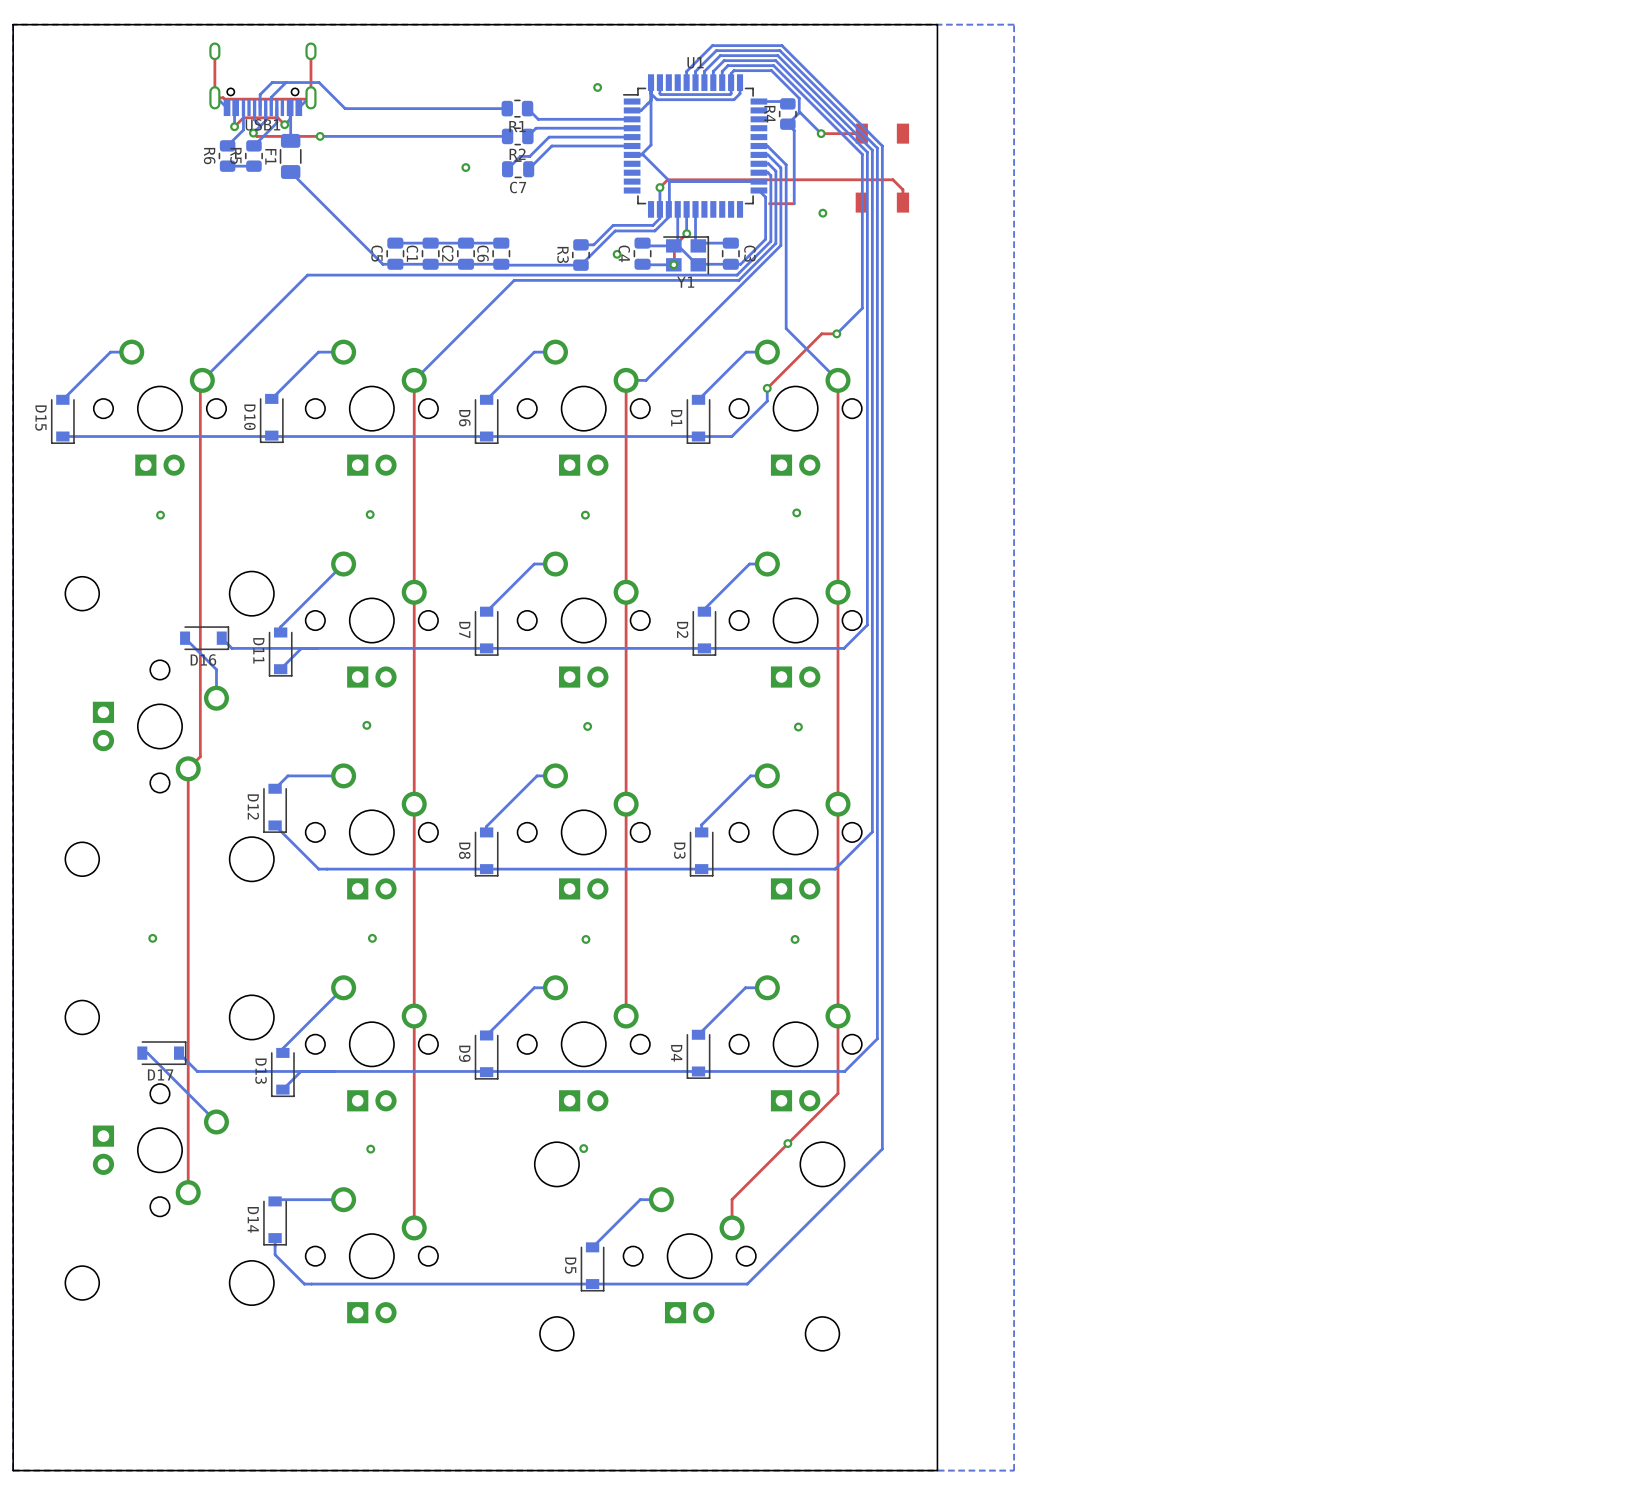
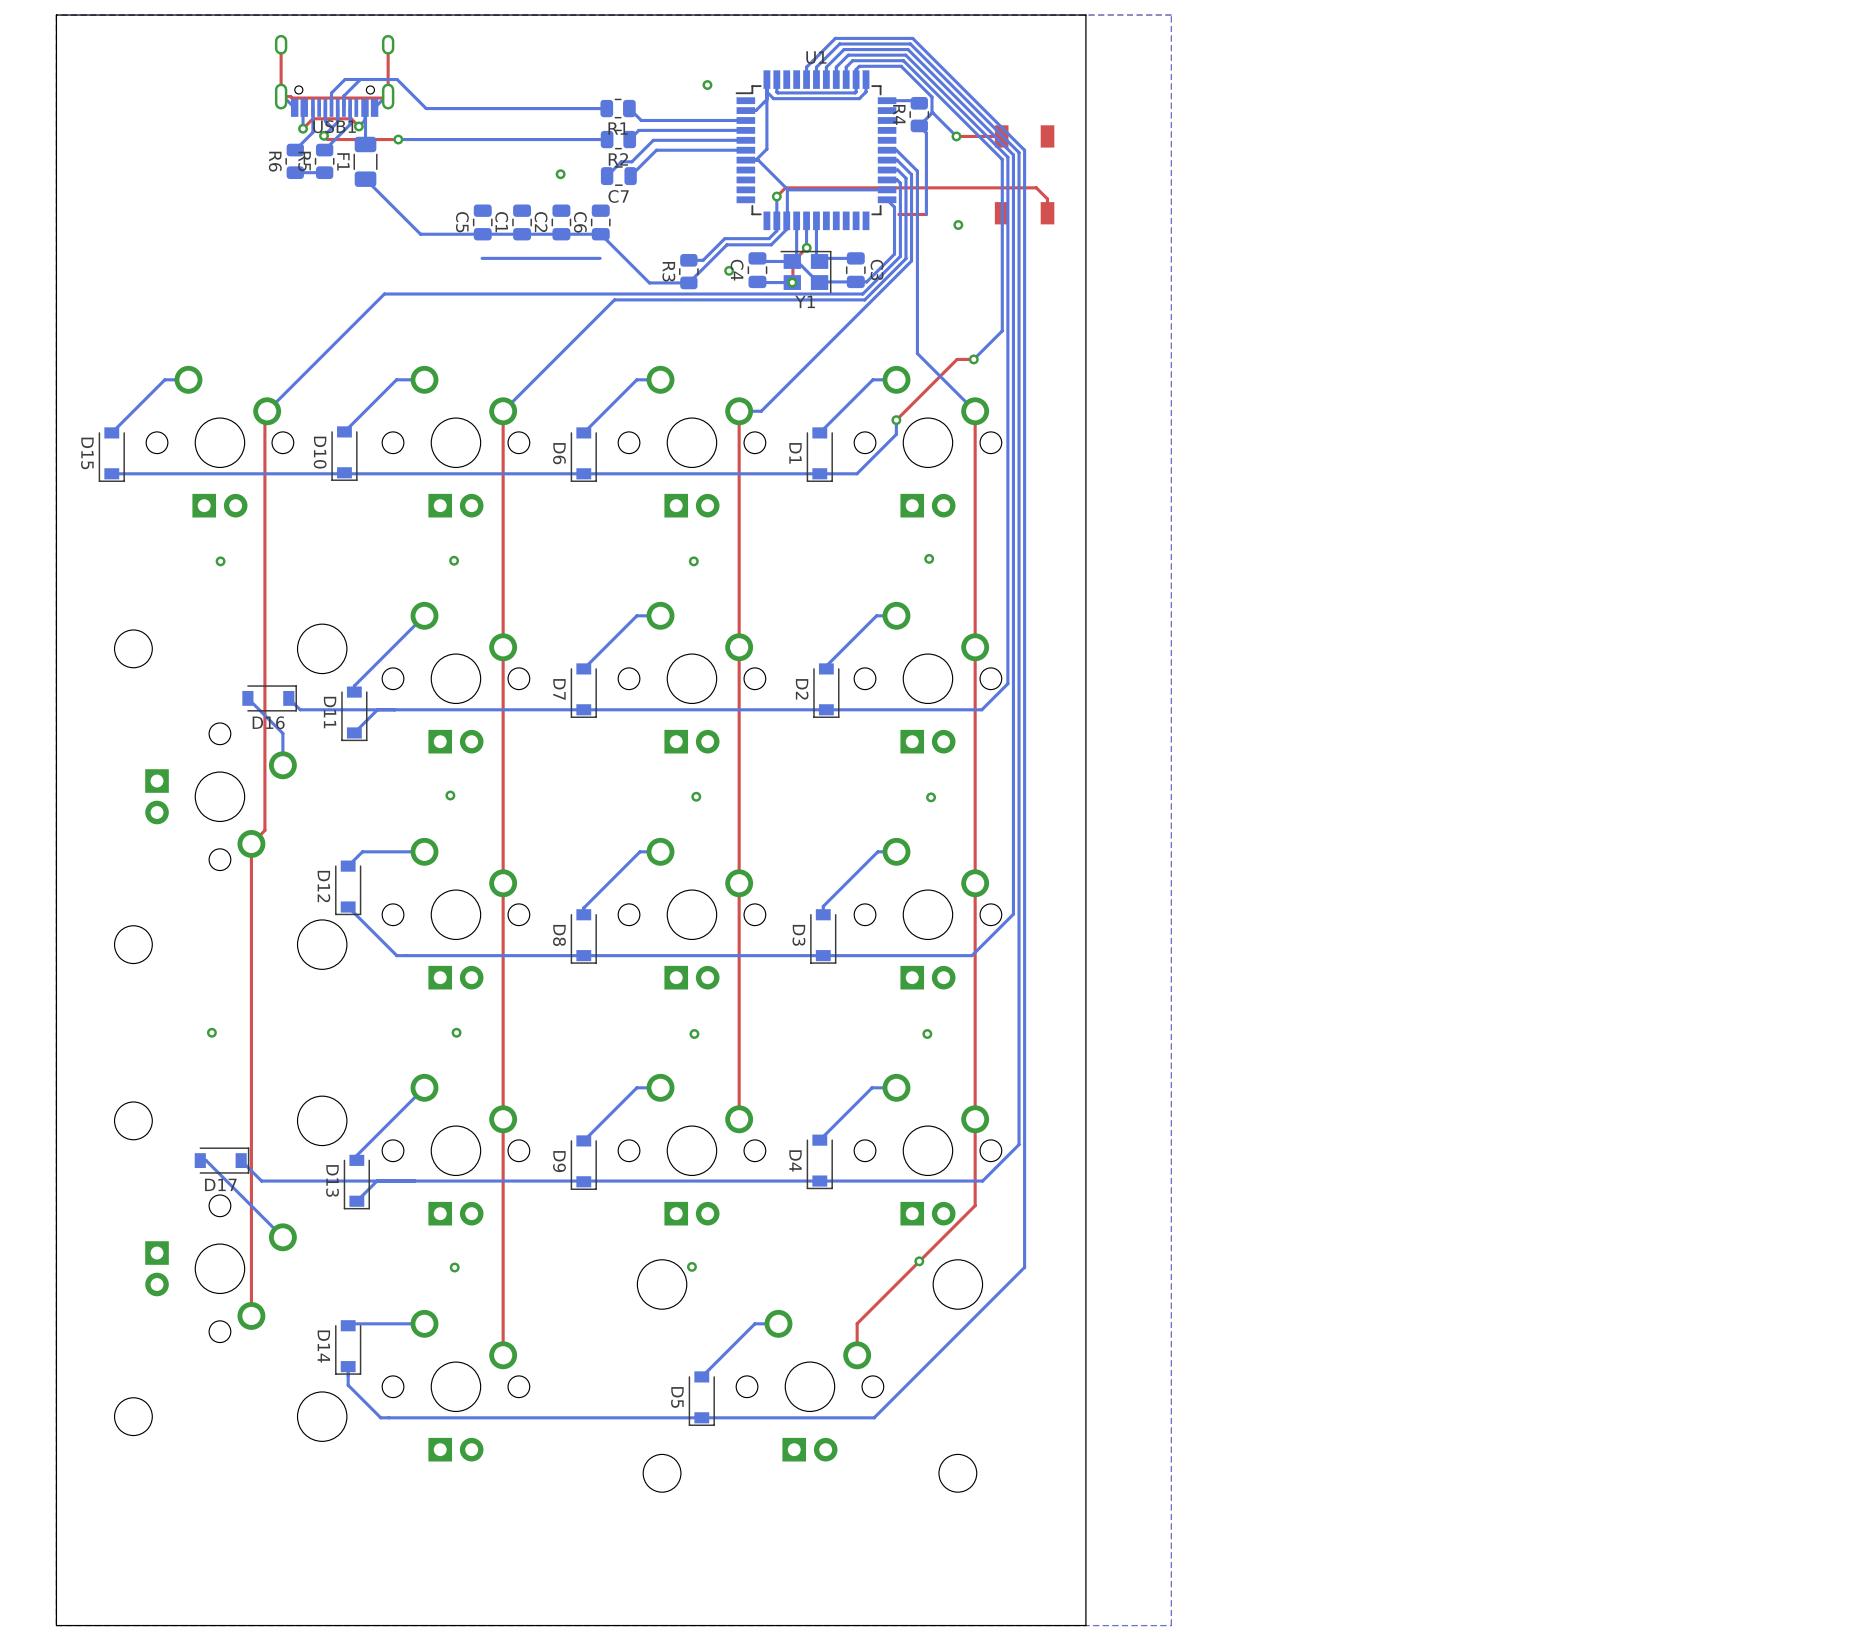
bottom track: (340, 221) (382, 264) (545, 265) -> (420, 234) (600, 234) (649, 282)
C5 position: (395, 253) -> (482, 222)
C1 position: (430, 253) -> (522, 222)
C2 position: (465, 253) -> (561, 222)
C6 position: (501, 253) -> (600, 222)

